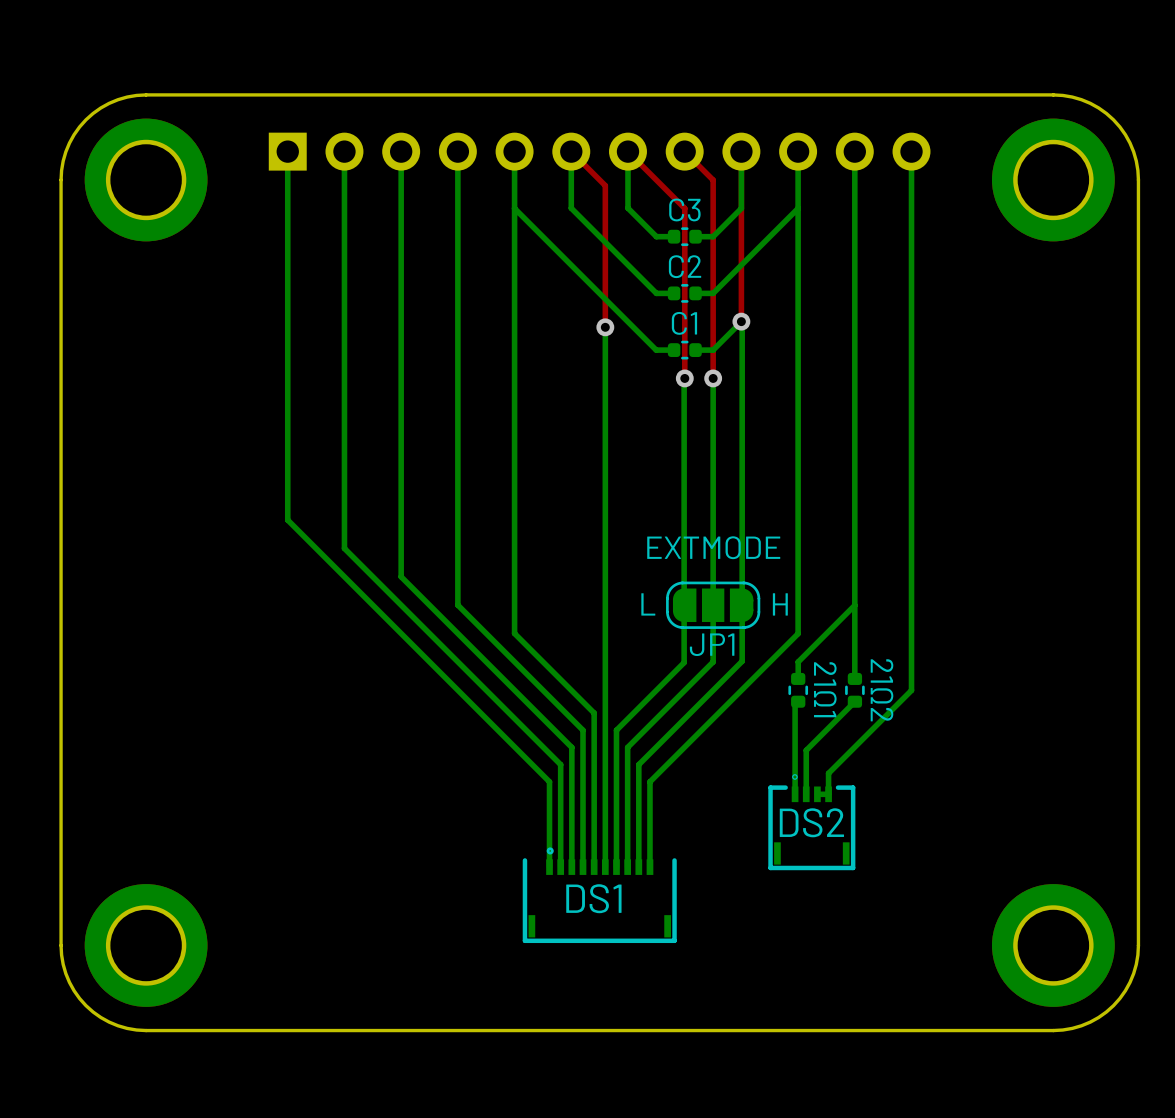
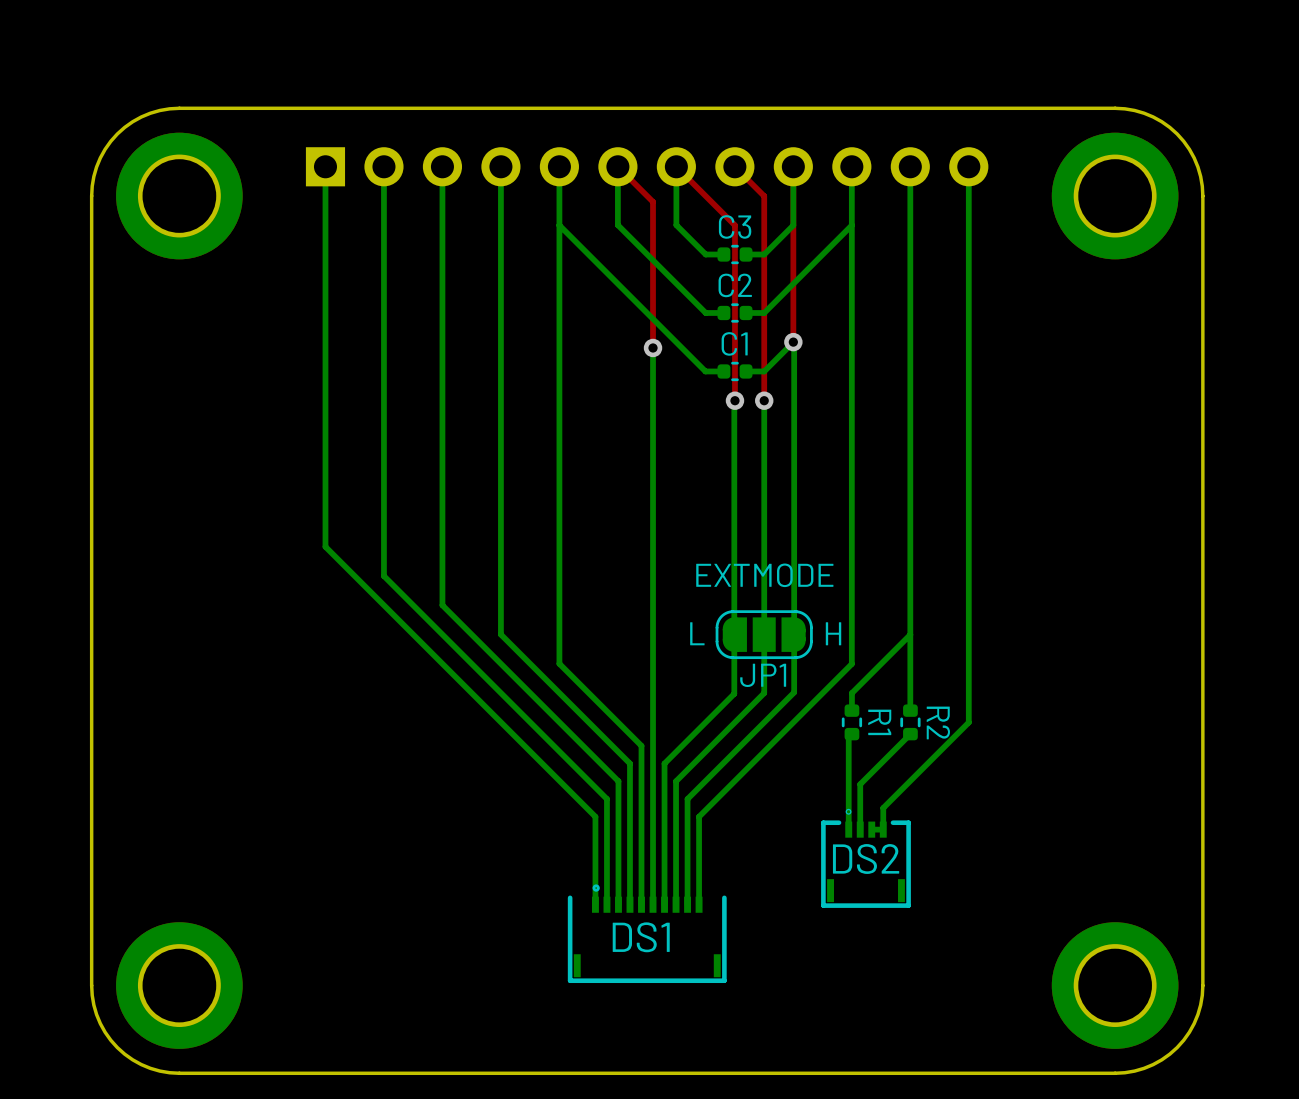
21Ω1 name: 21Ω1 (825, 689) -> R1 (879, 722)
21Ω2 name: 21Ω2 (882, 690) -> R2 (938, 722)

